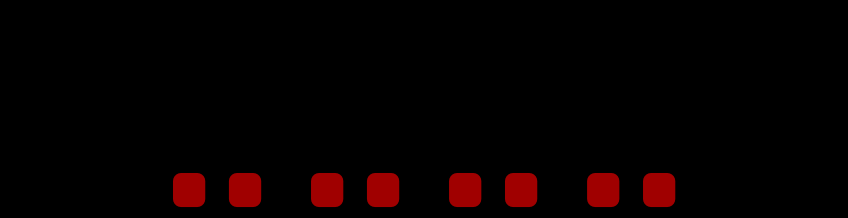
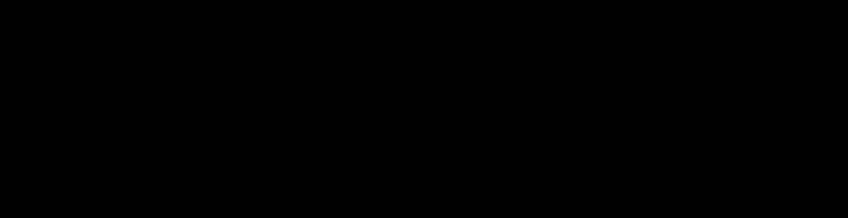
part: (217, 190) -> none
part: (355, 190) -> none
part: (493, 190) -> none
part: (631, 190) -> none

